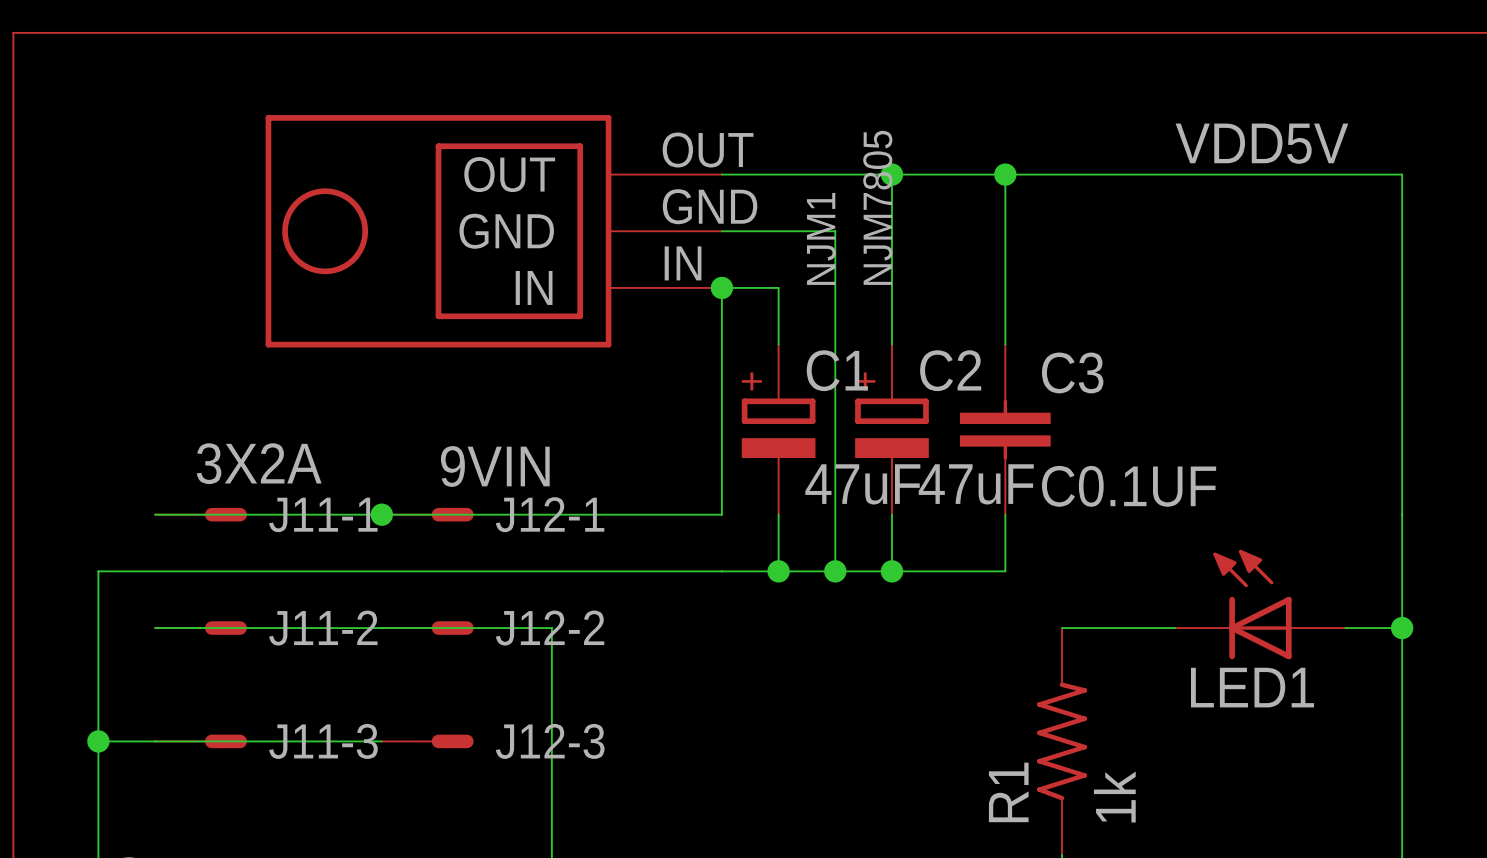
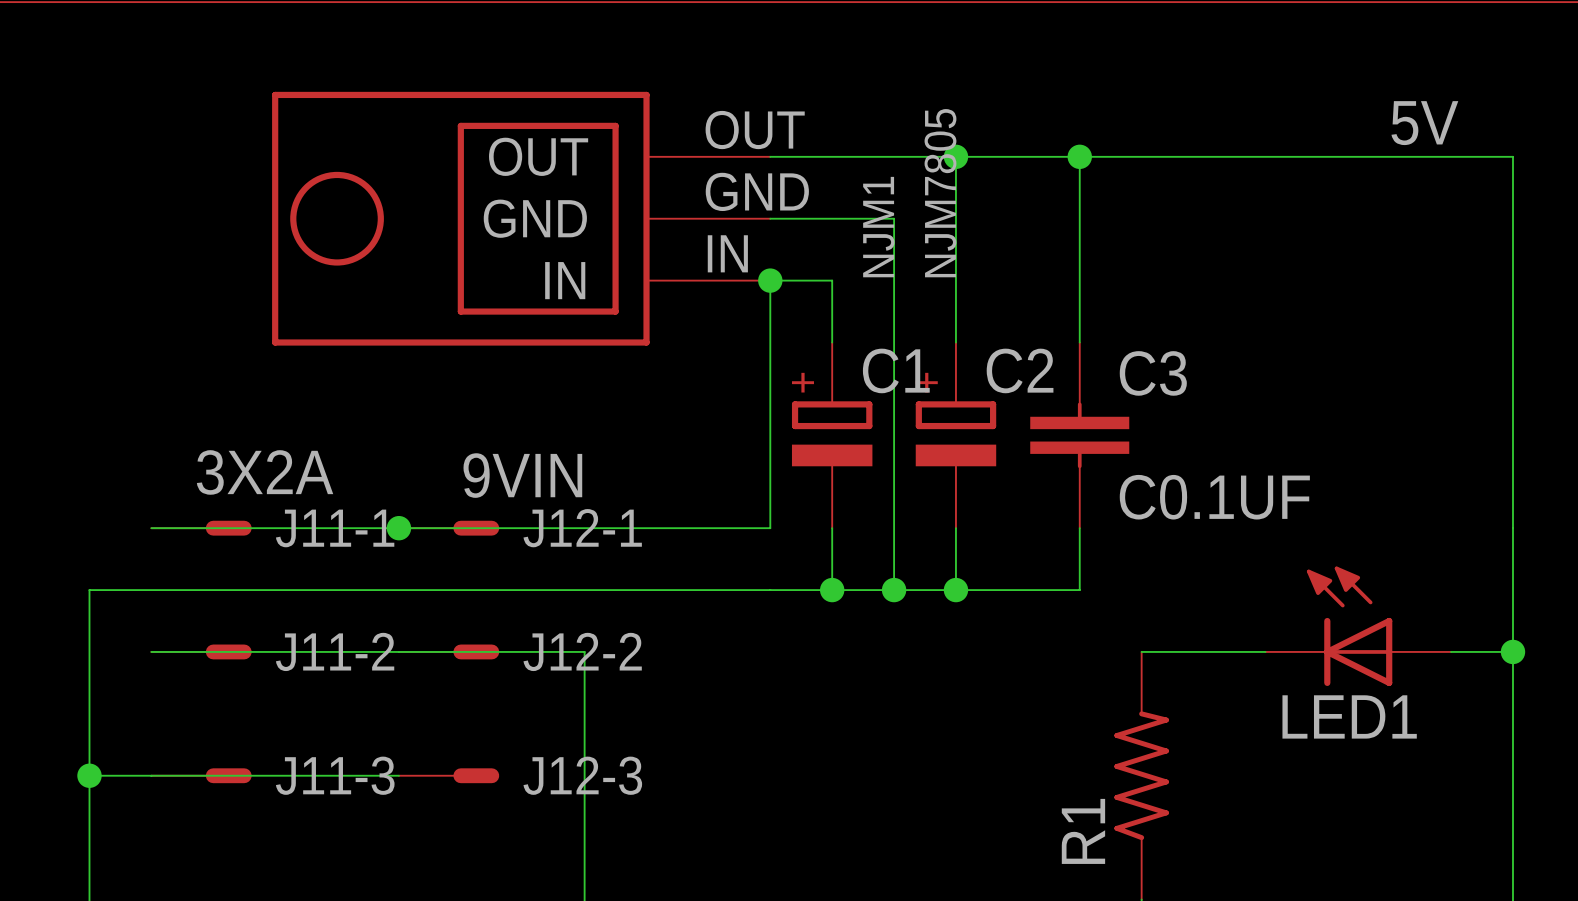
label: VDD5V (1261, 143) -> none
label: none -> 5V (1424, 123)
C1 value: 47uF (862, 484) -> none
C2 value: 47uF (976, 484) -> none
R1 value: 1k (1114, 797) -> none

